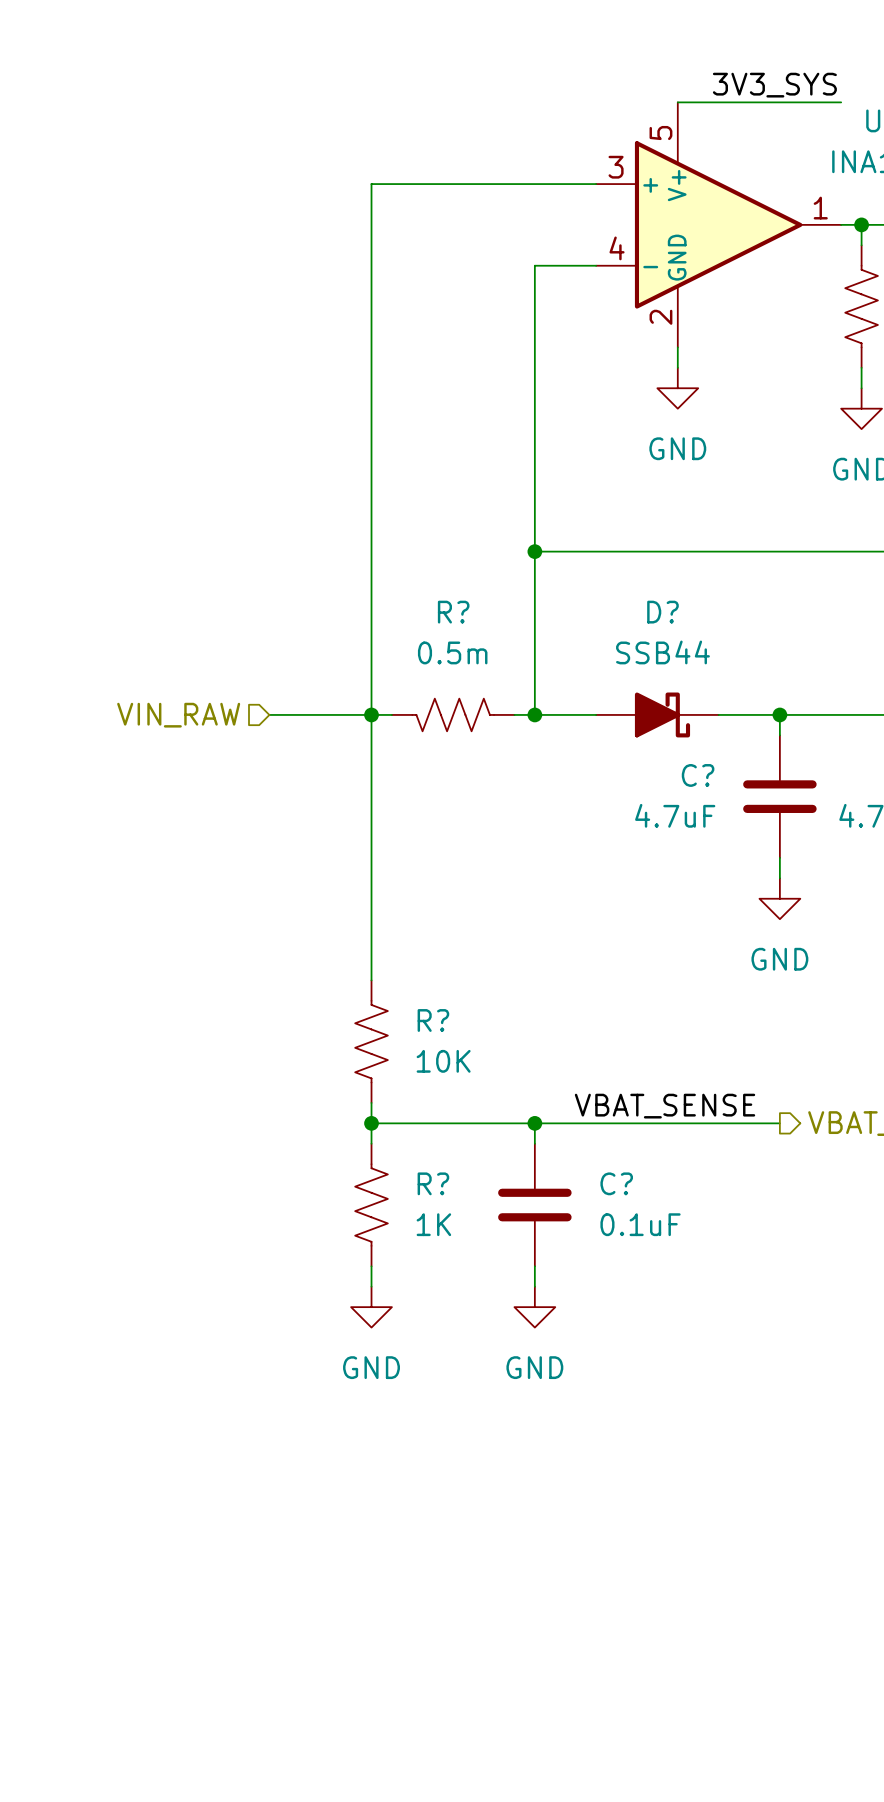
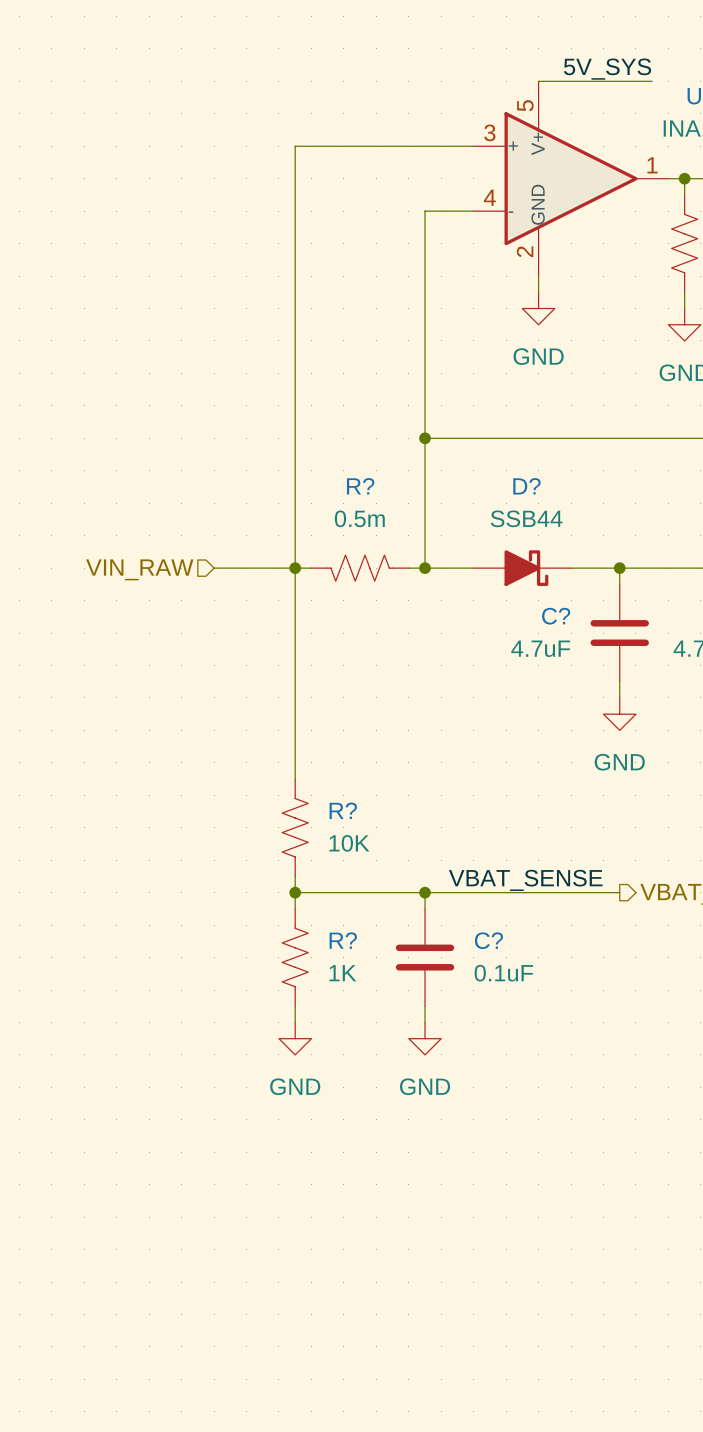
label: 3V3_SYS (774, 85) -> 5V_SYS (607, 69)
wire: (820, 102) (841, 102) -> none

